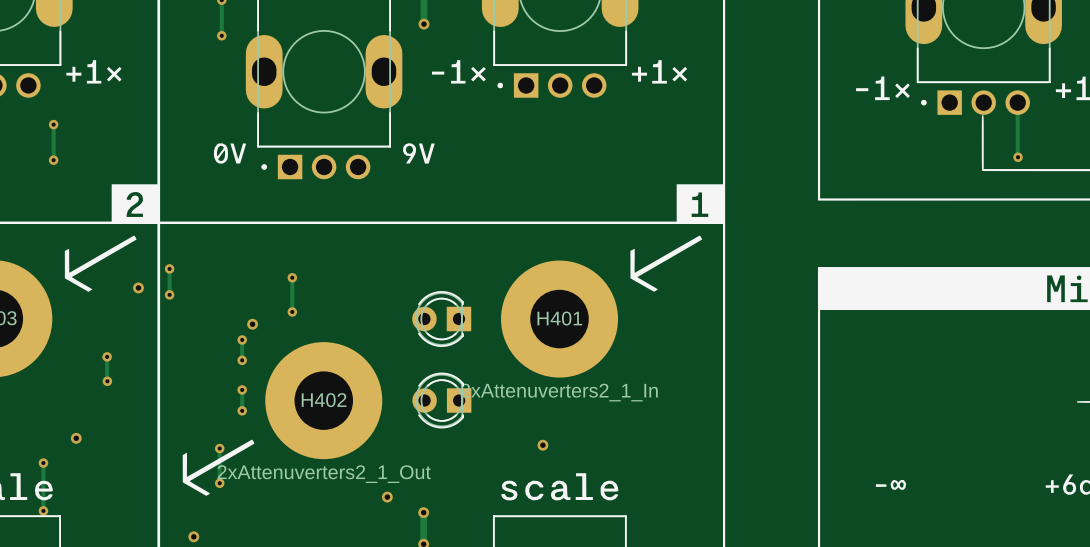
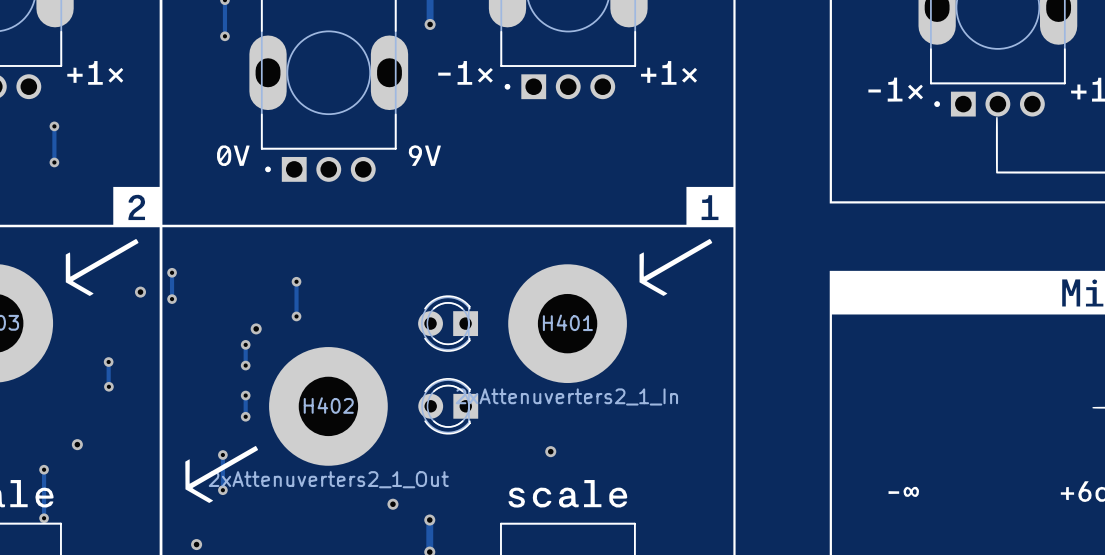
track: (1017, 102) (1018, 157) -> none
via: (1018, 157) -> none

